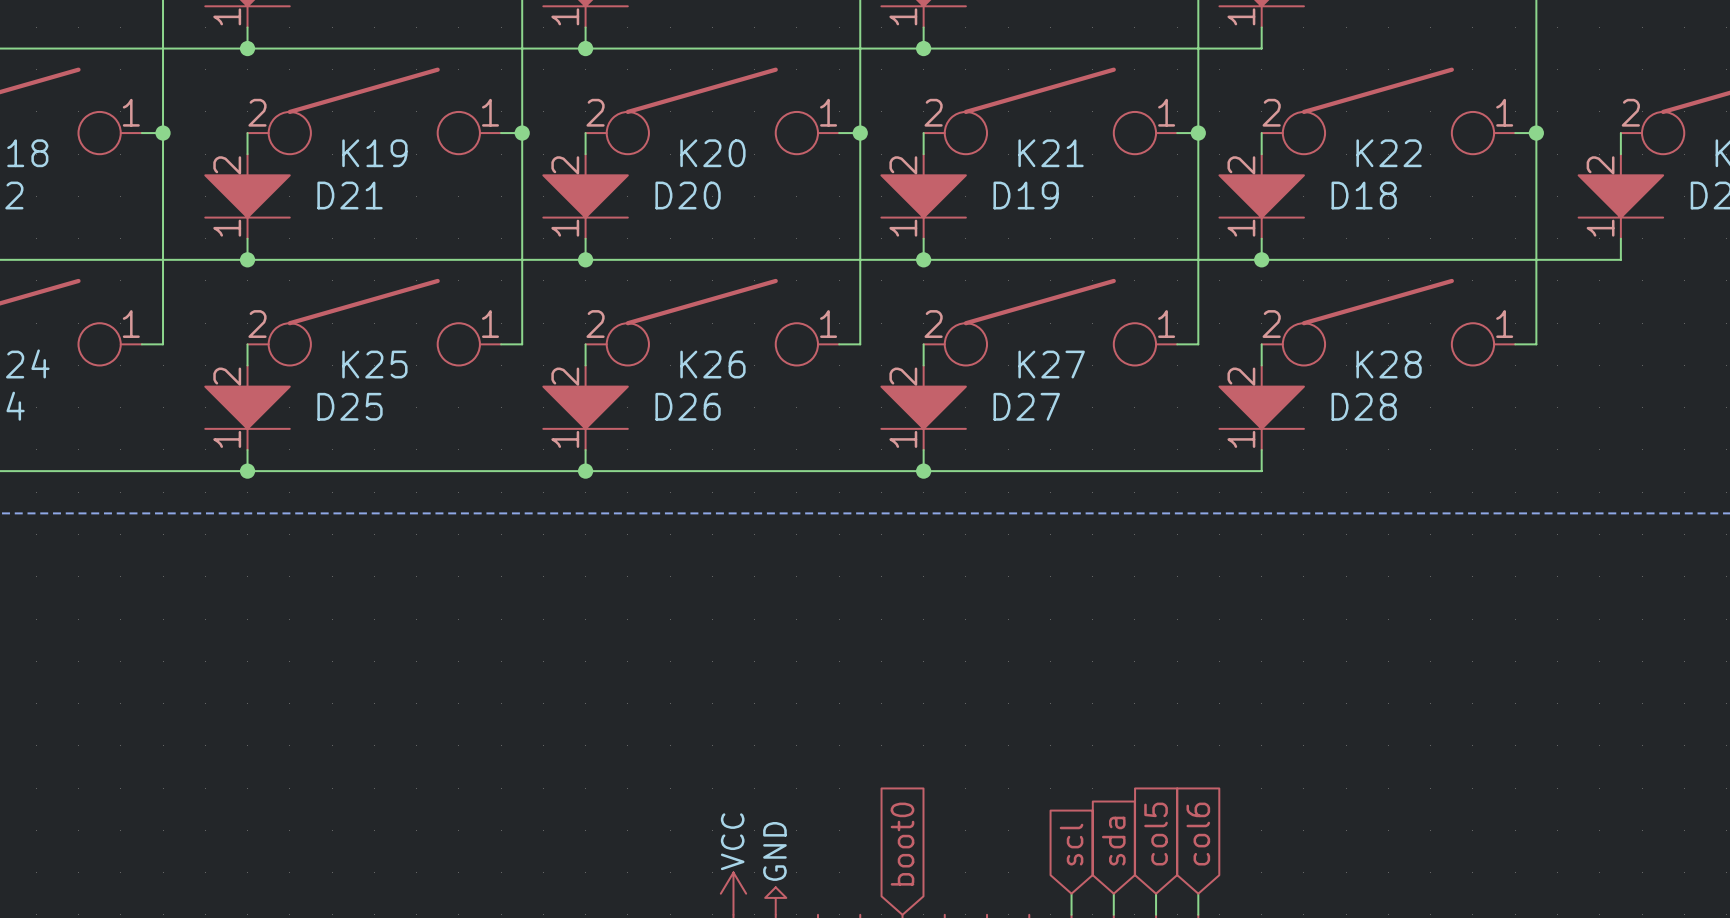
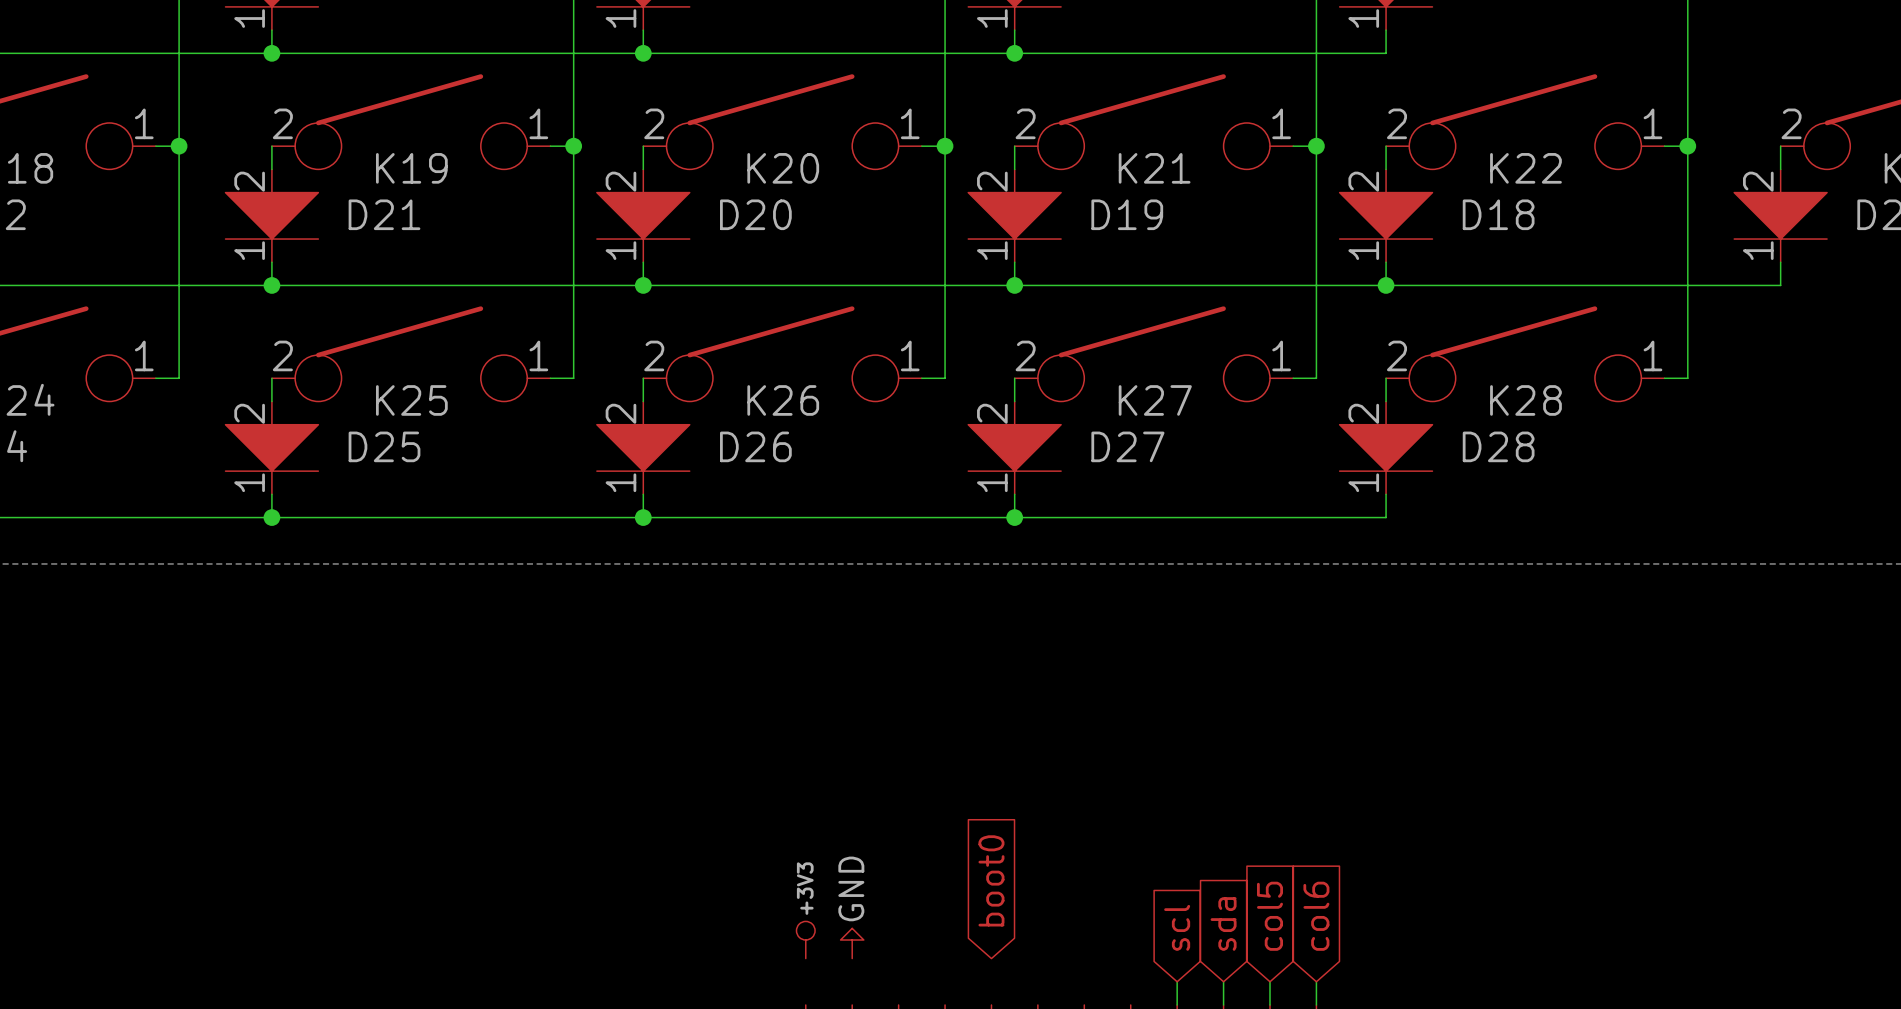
global label position: boot0 (902, 844) -> boot0 (991, 880)
power symbol: none -> +3V3 (805, 940)
power symbol: VCC (733, 893) -> none
power symbol position: GND (775, 901) -> GND (852, 943)

